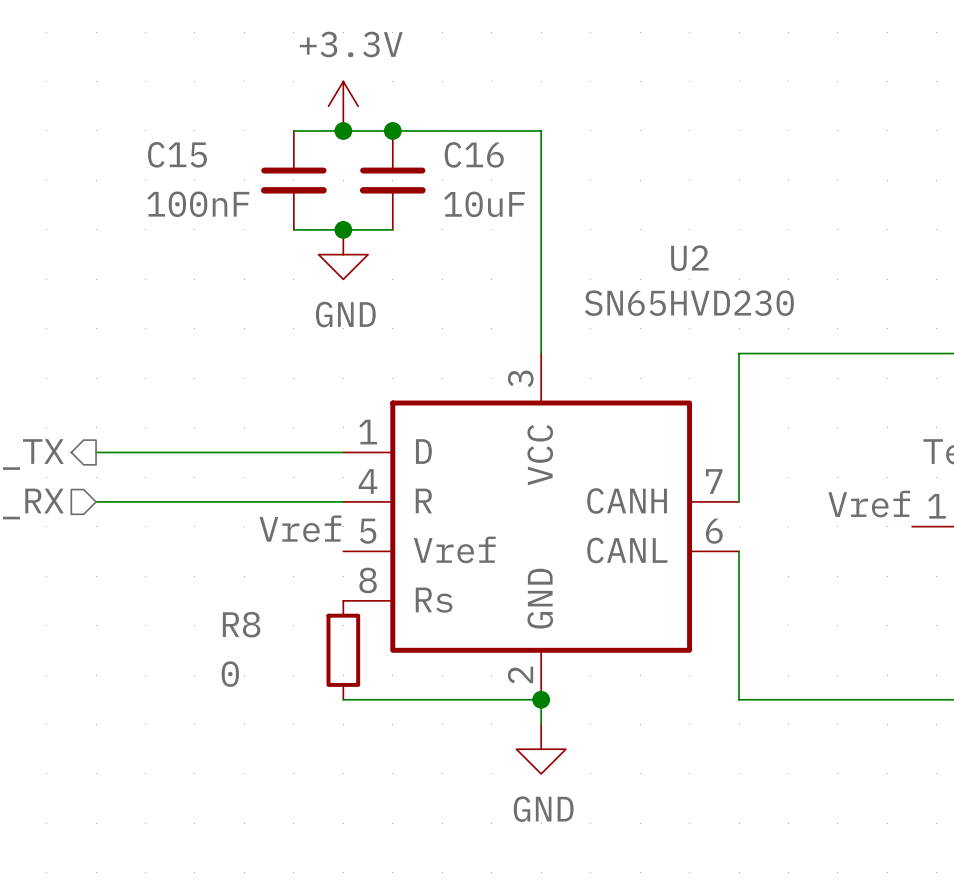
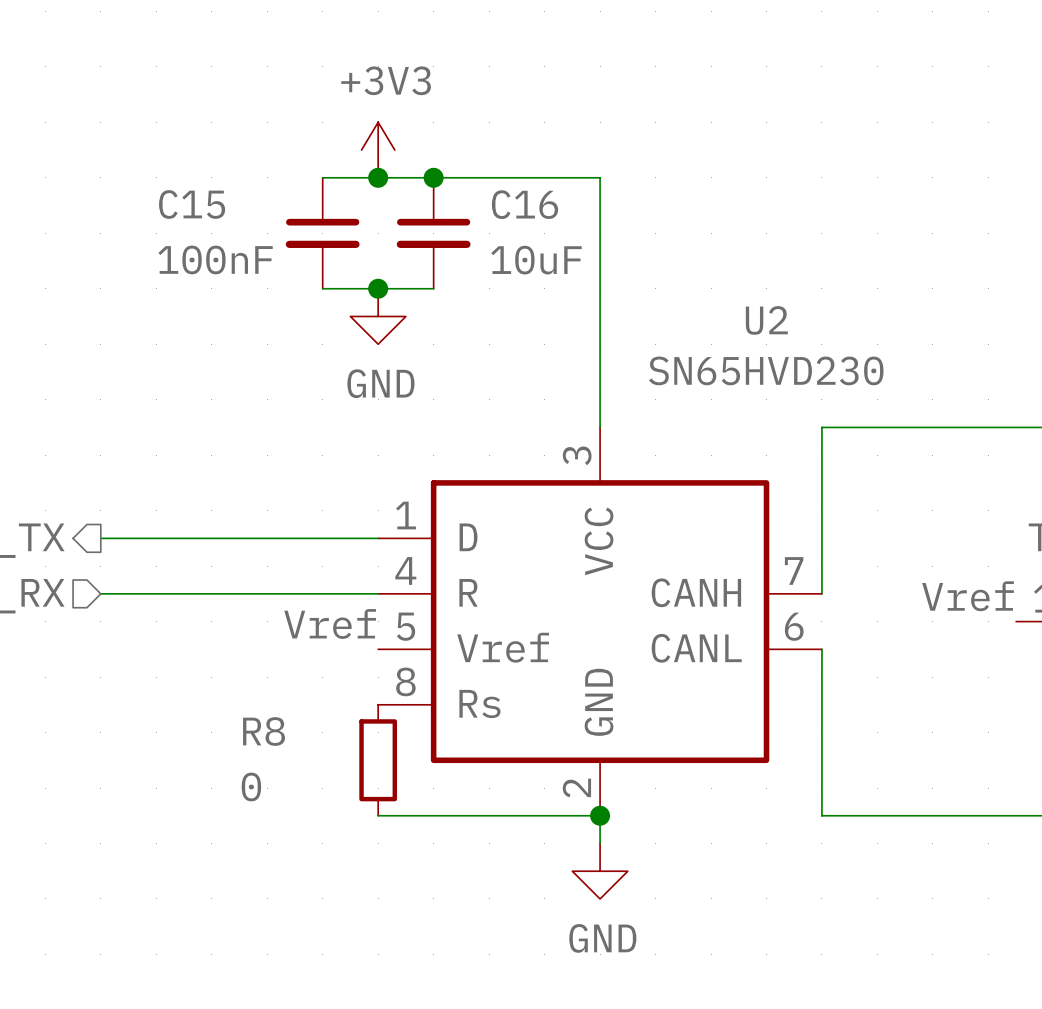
power symbol: +3.3V (343, 106) -> +3V3 (378, 150)

